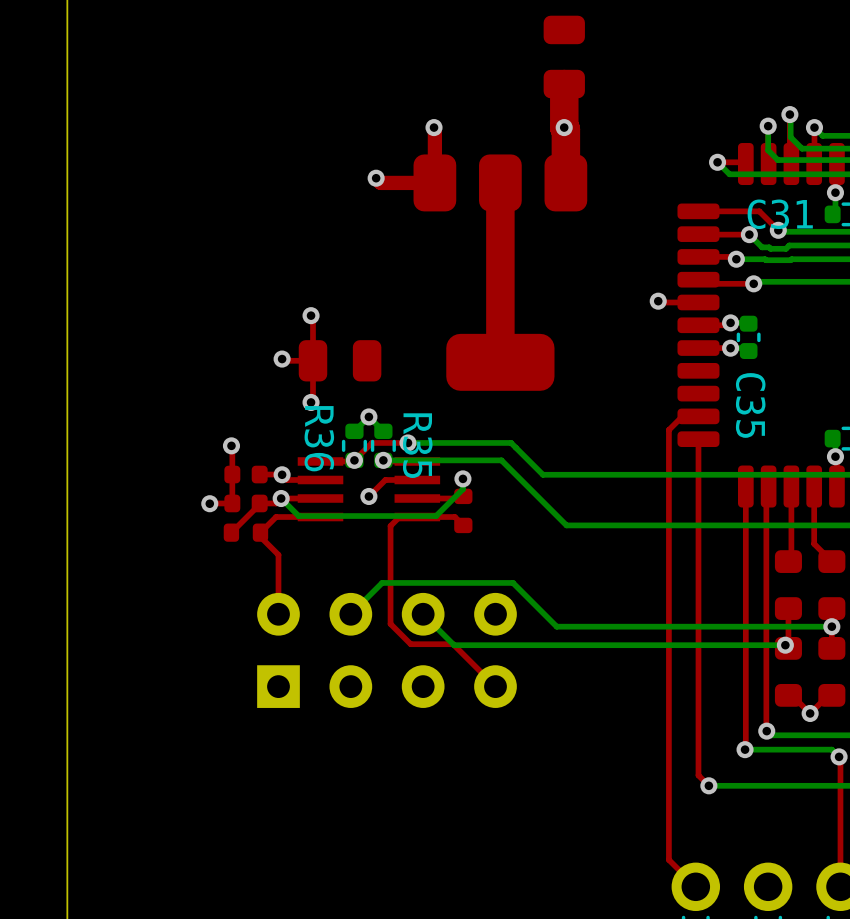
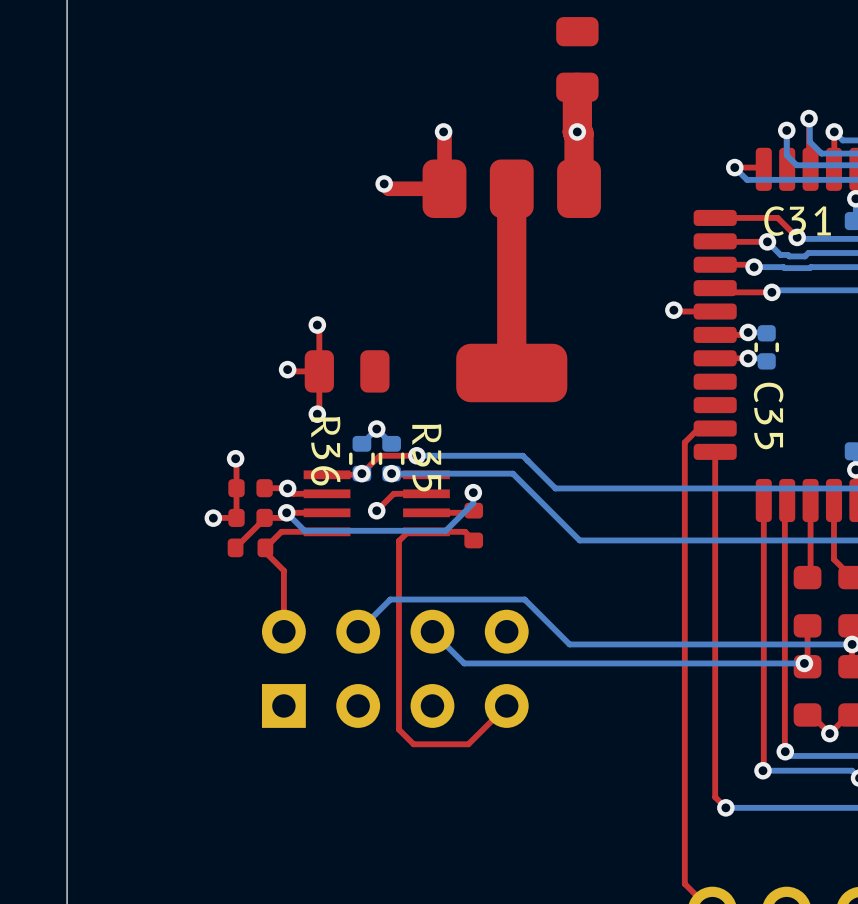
top track: (390, 623) (410, 644) (453, 644) (495, 686) -> (398, 641) (398, 729) (413, 744) (468, 744) (506, 705)

